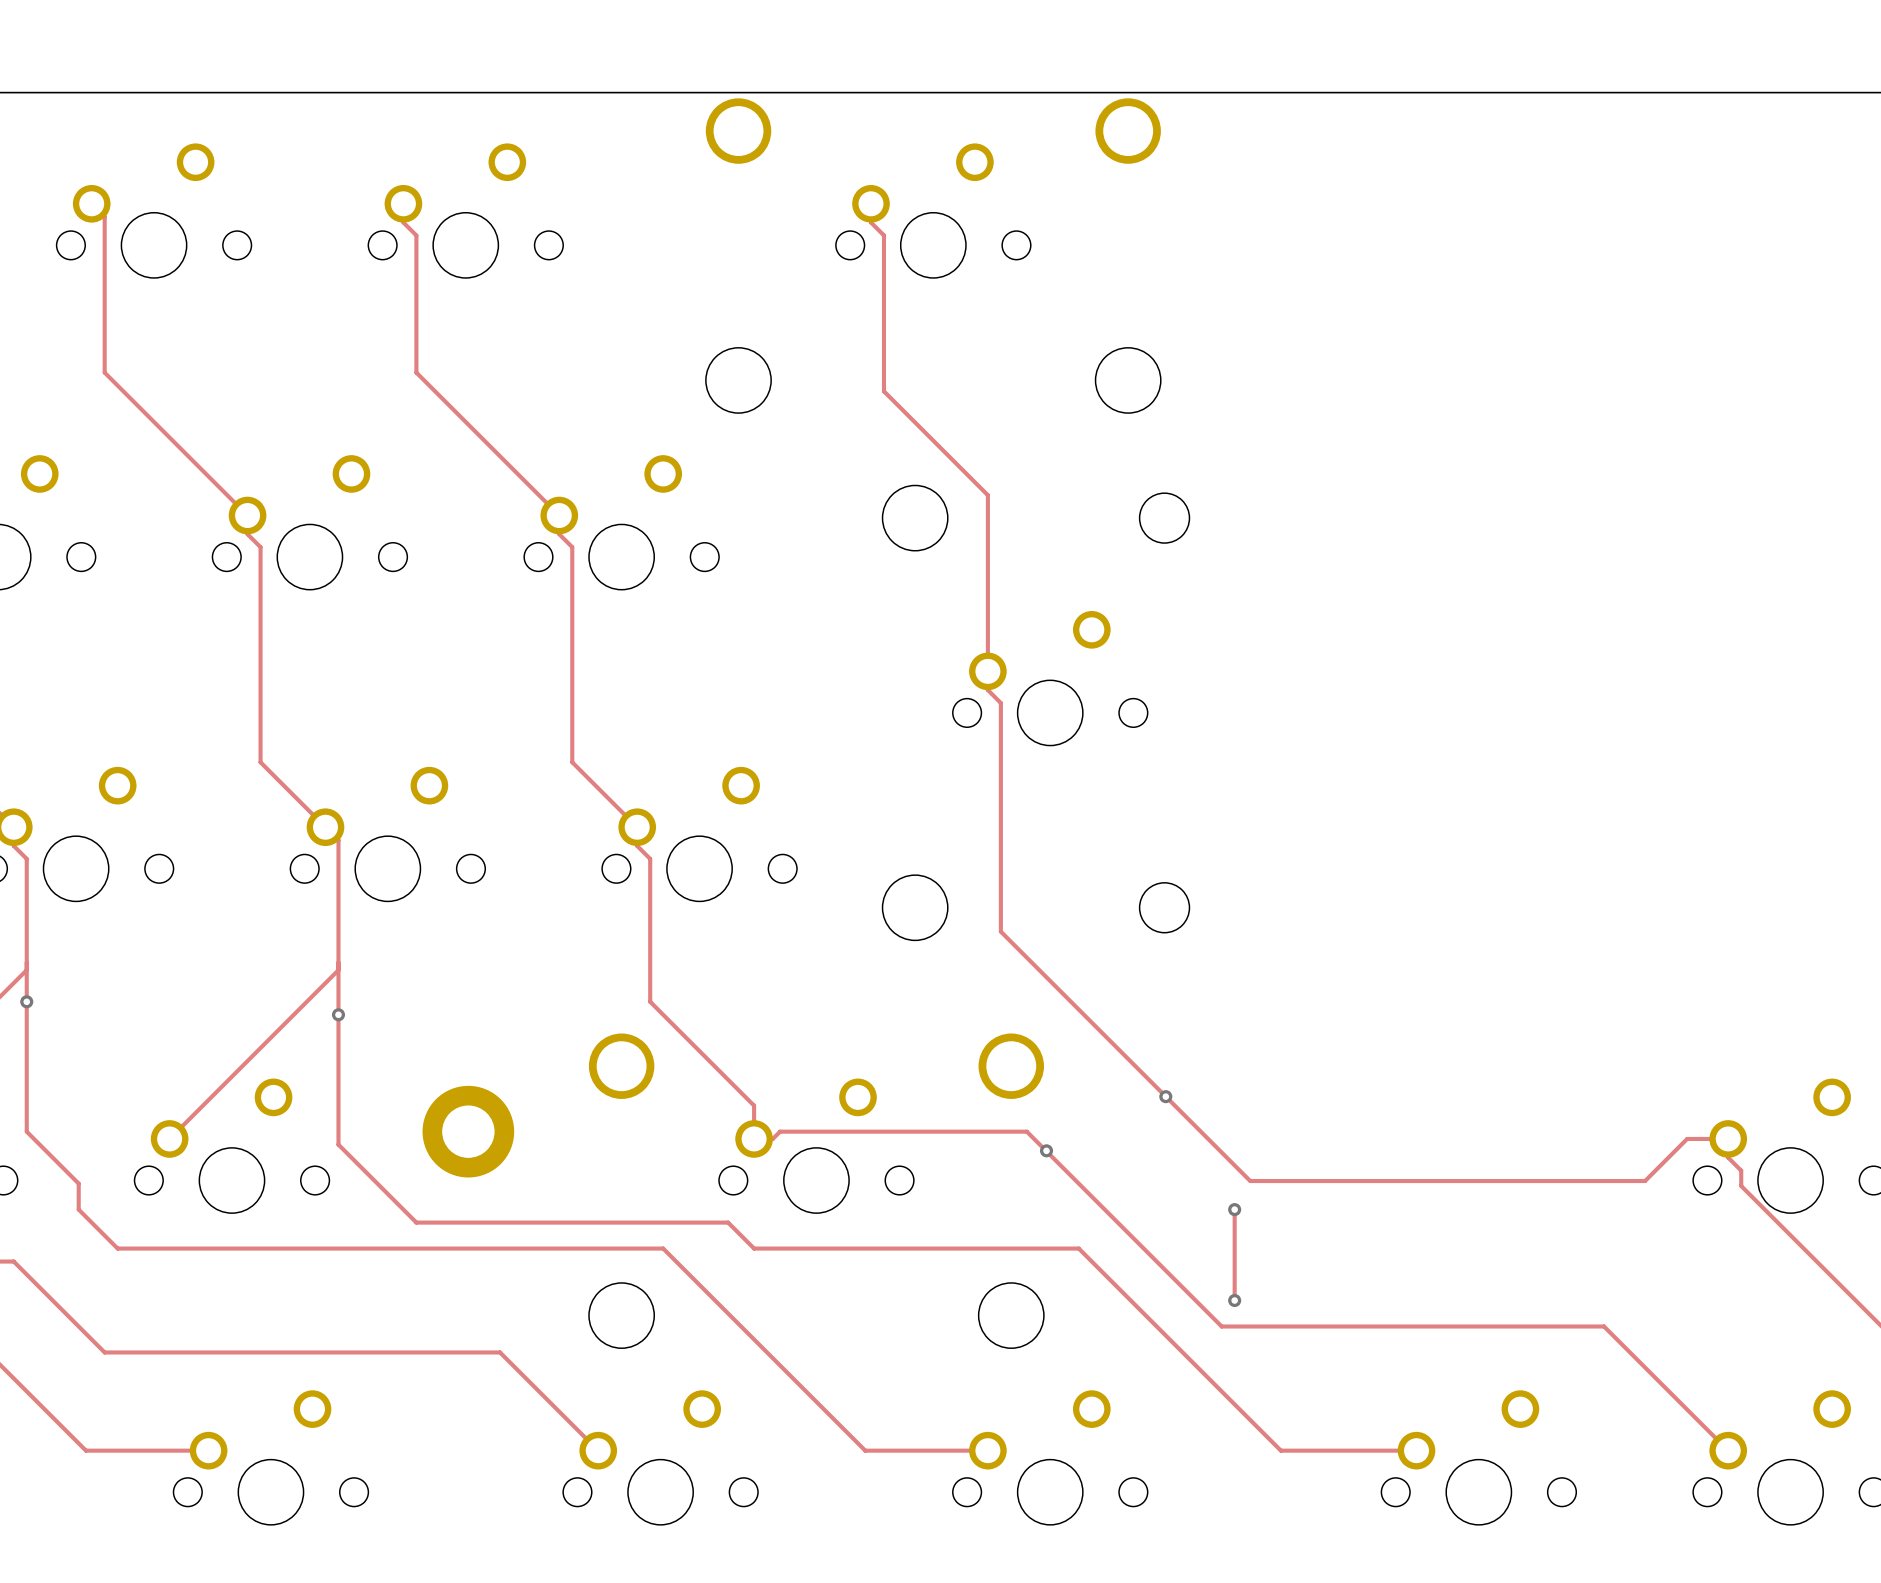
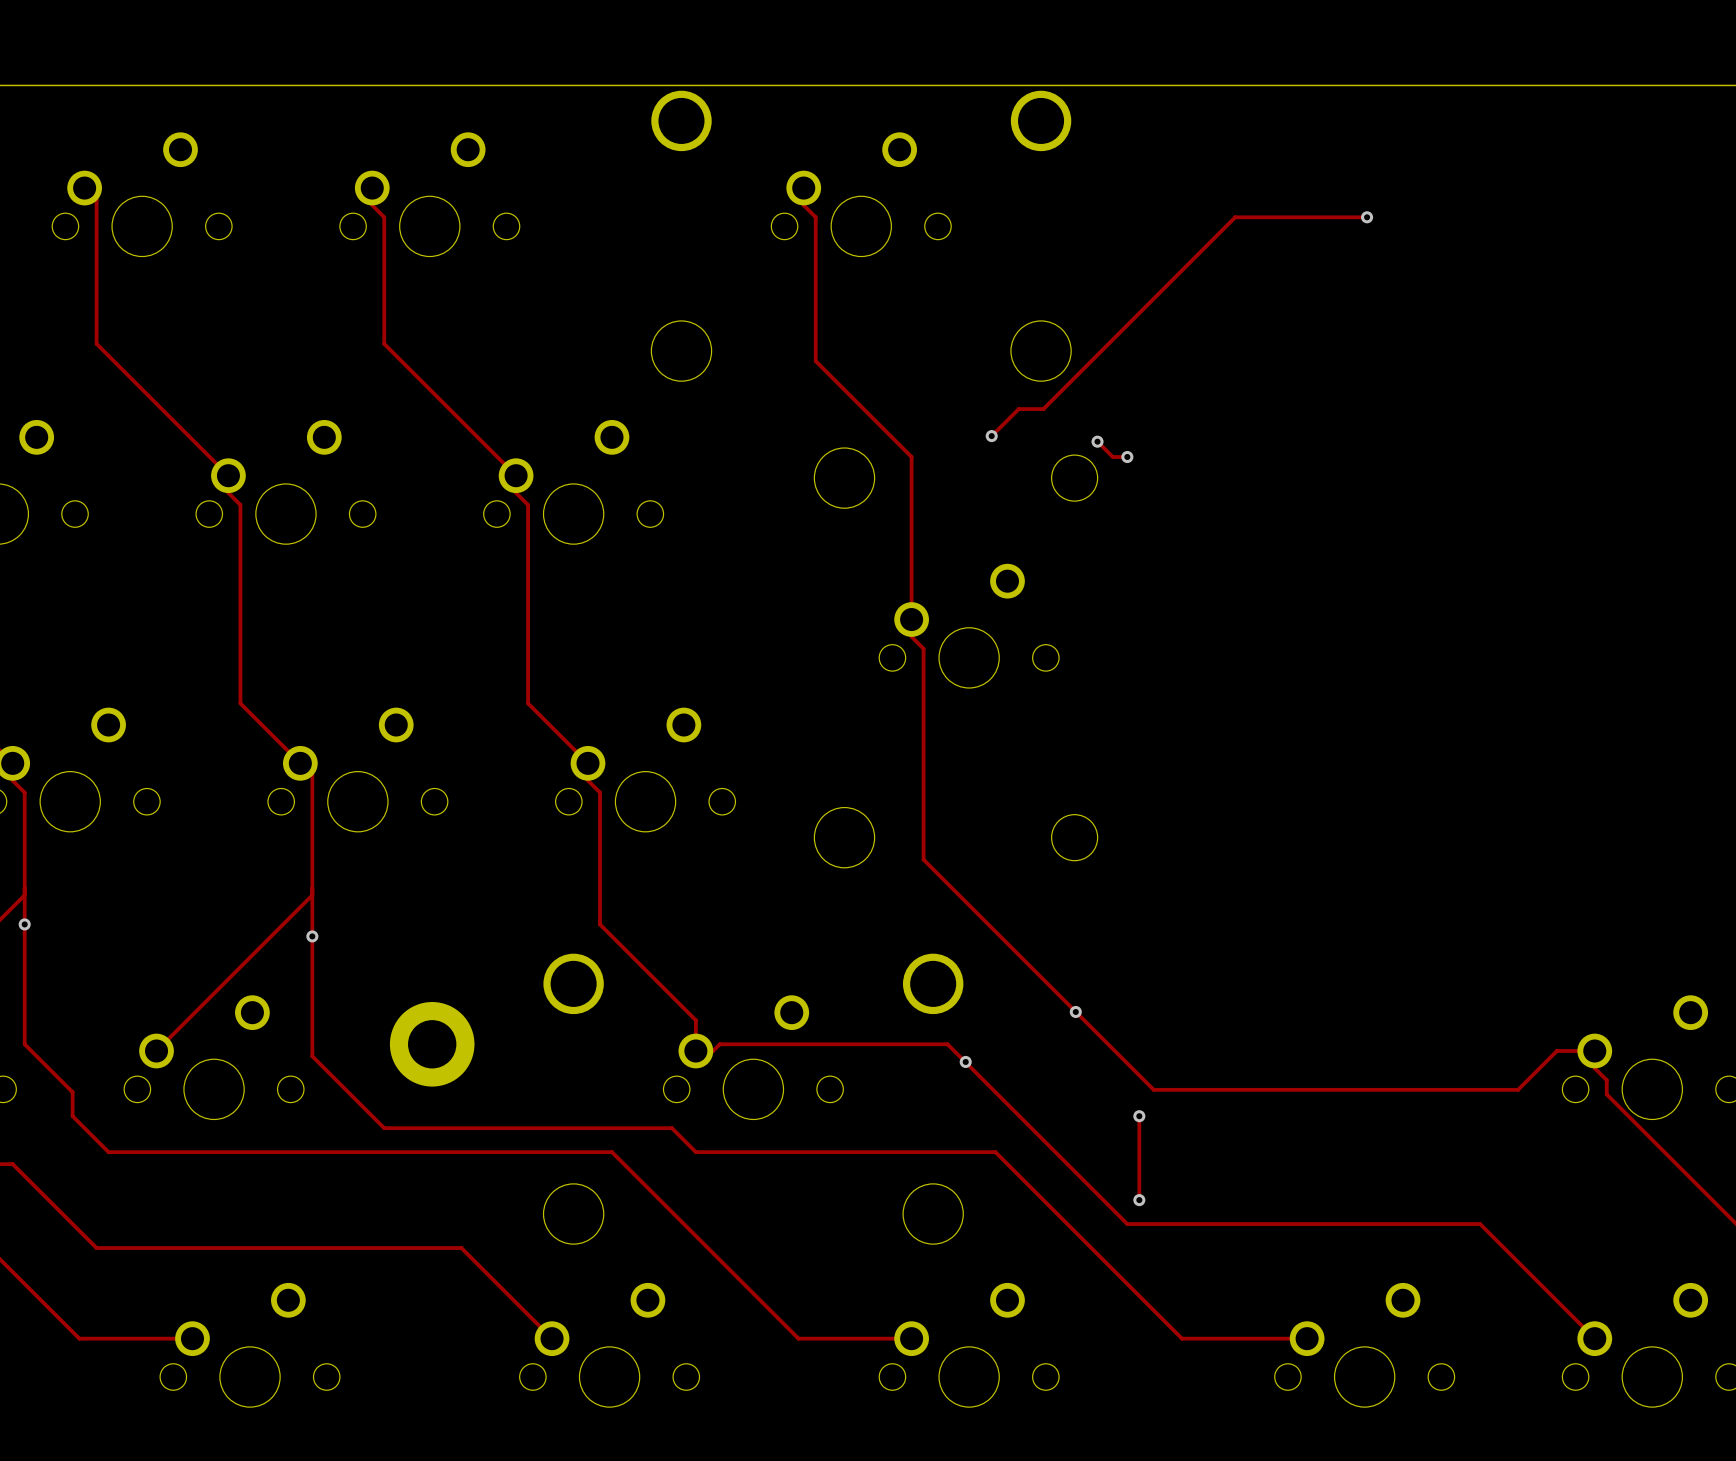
track: none -> (1367, 217) (1235, 217) (1043, 409) (1018, 409) (991, 436)
via: none -> (1367, 217)
via: none -> (991, 436)
track: none -> (1097, 441) (1112, 457) (1127, 457)
via: none -> (1097, 441)
via: none -> (1127, 457)

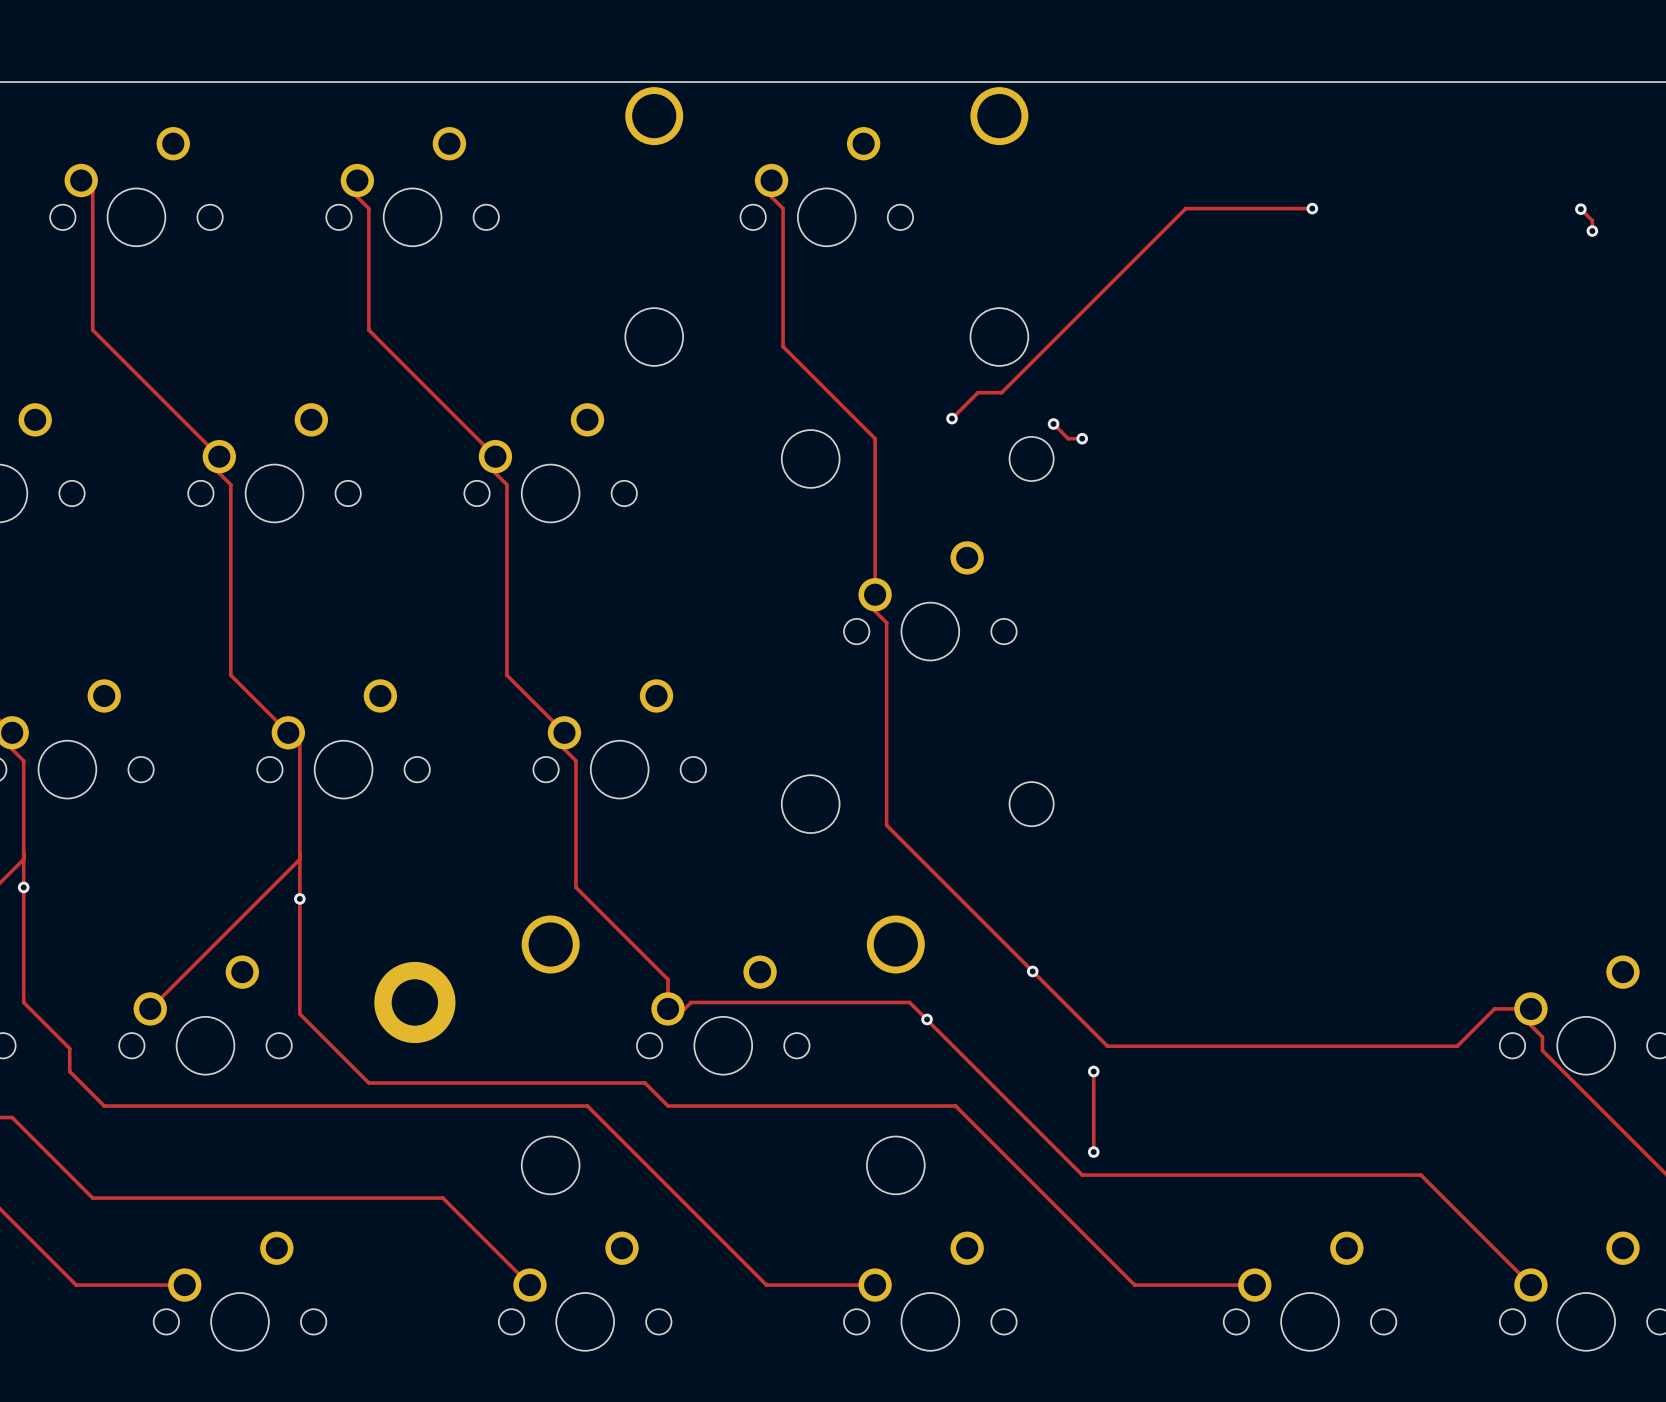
track: none -> (1580, 209) (1592, 220) (1592, 231)
via: none -> (1580, 209)
via: none -> (1592, 231)

